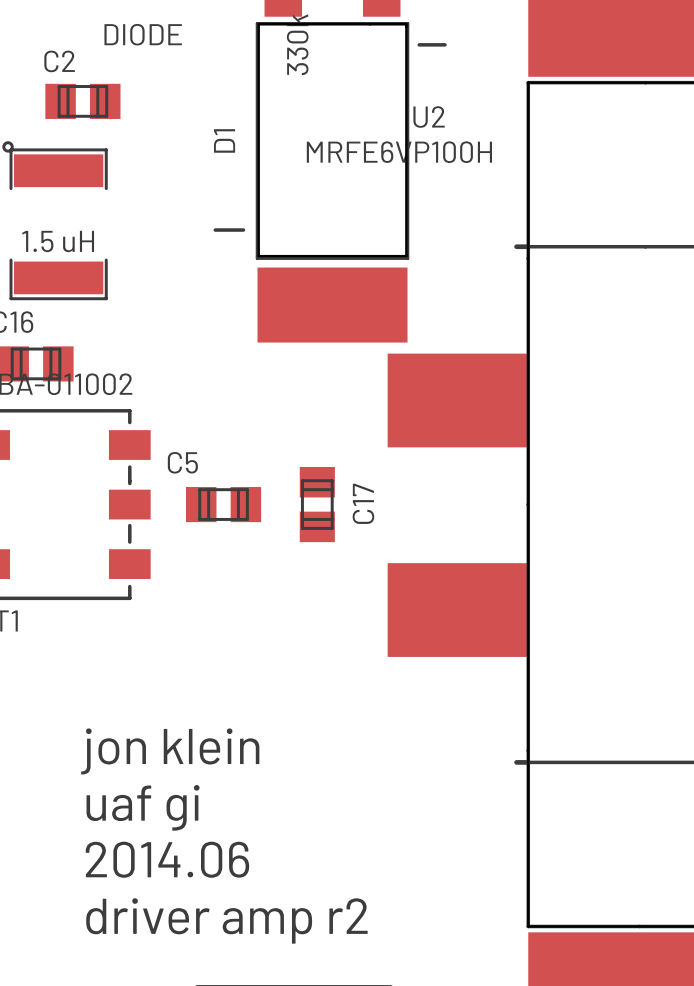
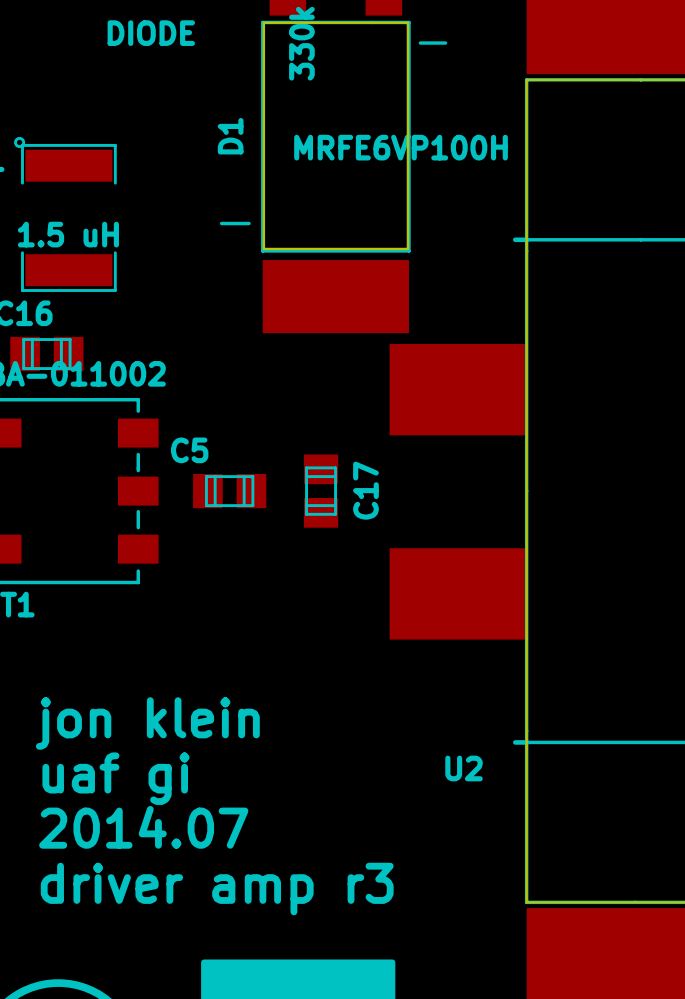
C2: (82, 101) -> none
U2 name position: U2 (429, 117) -> U2 (464, 768)
text position: jon klein (170, 751) -> jon klein (147, 723)
text position: uaf gi (143, 807) -> uaf gi (116, 778)
text: 2014.06 (167, 859) -> 2014.07 (143, 827)
text: driver amp r2 (226, 920) -> driver amp r3 (217, 889)

